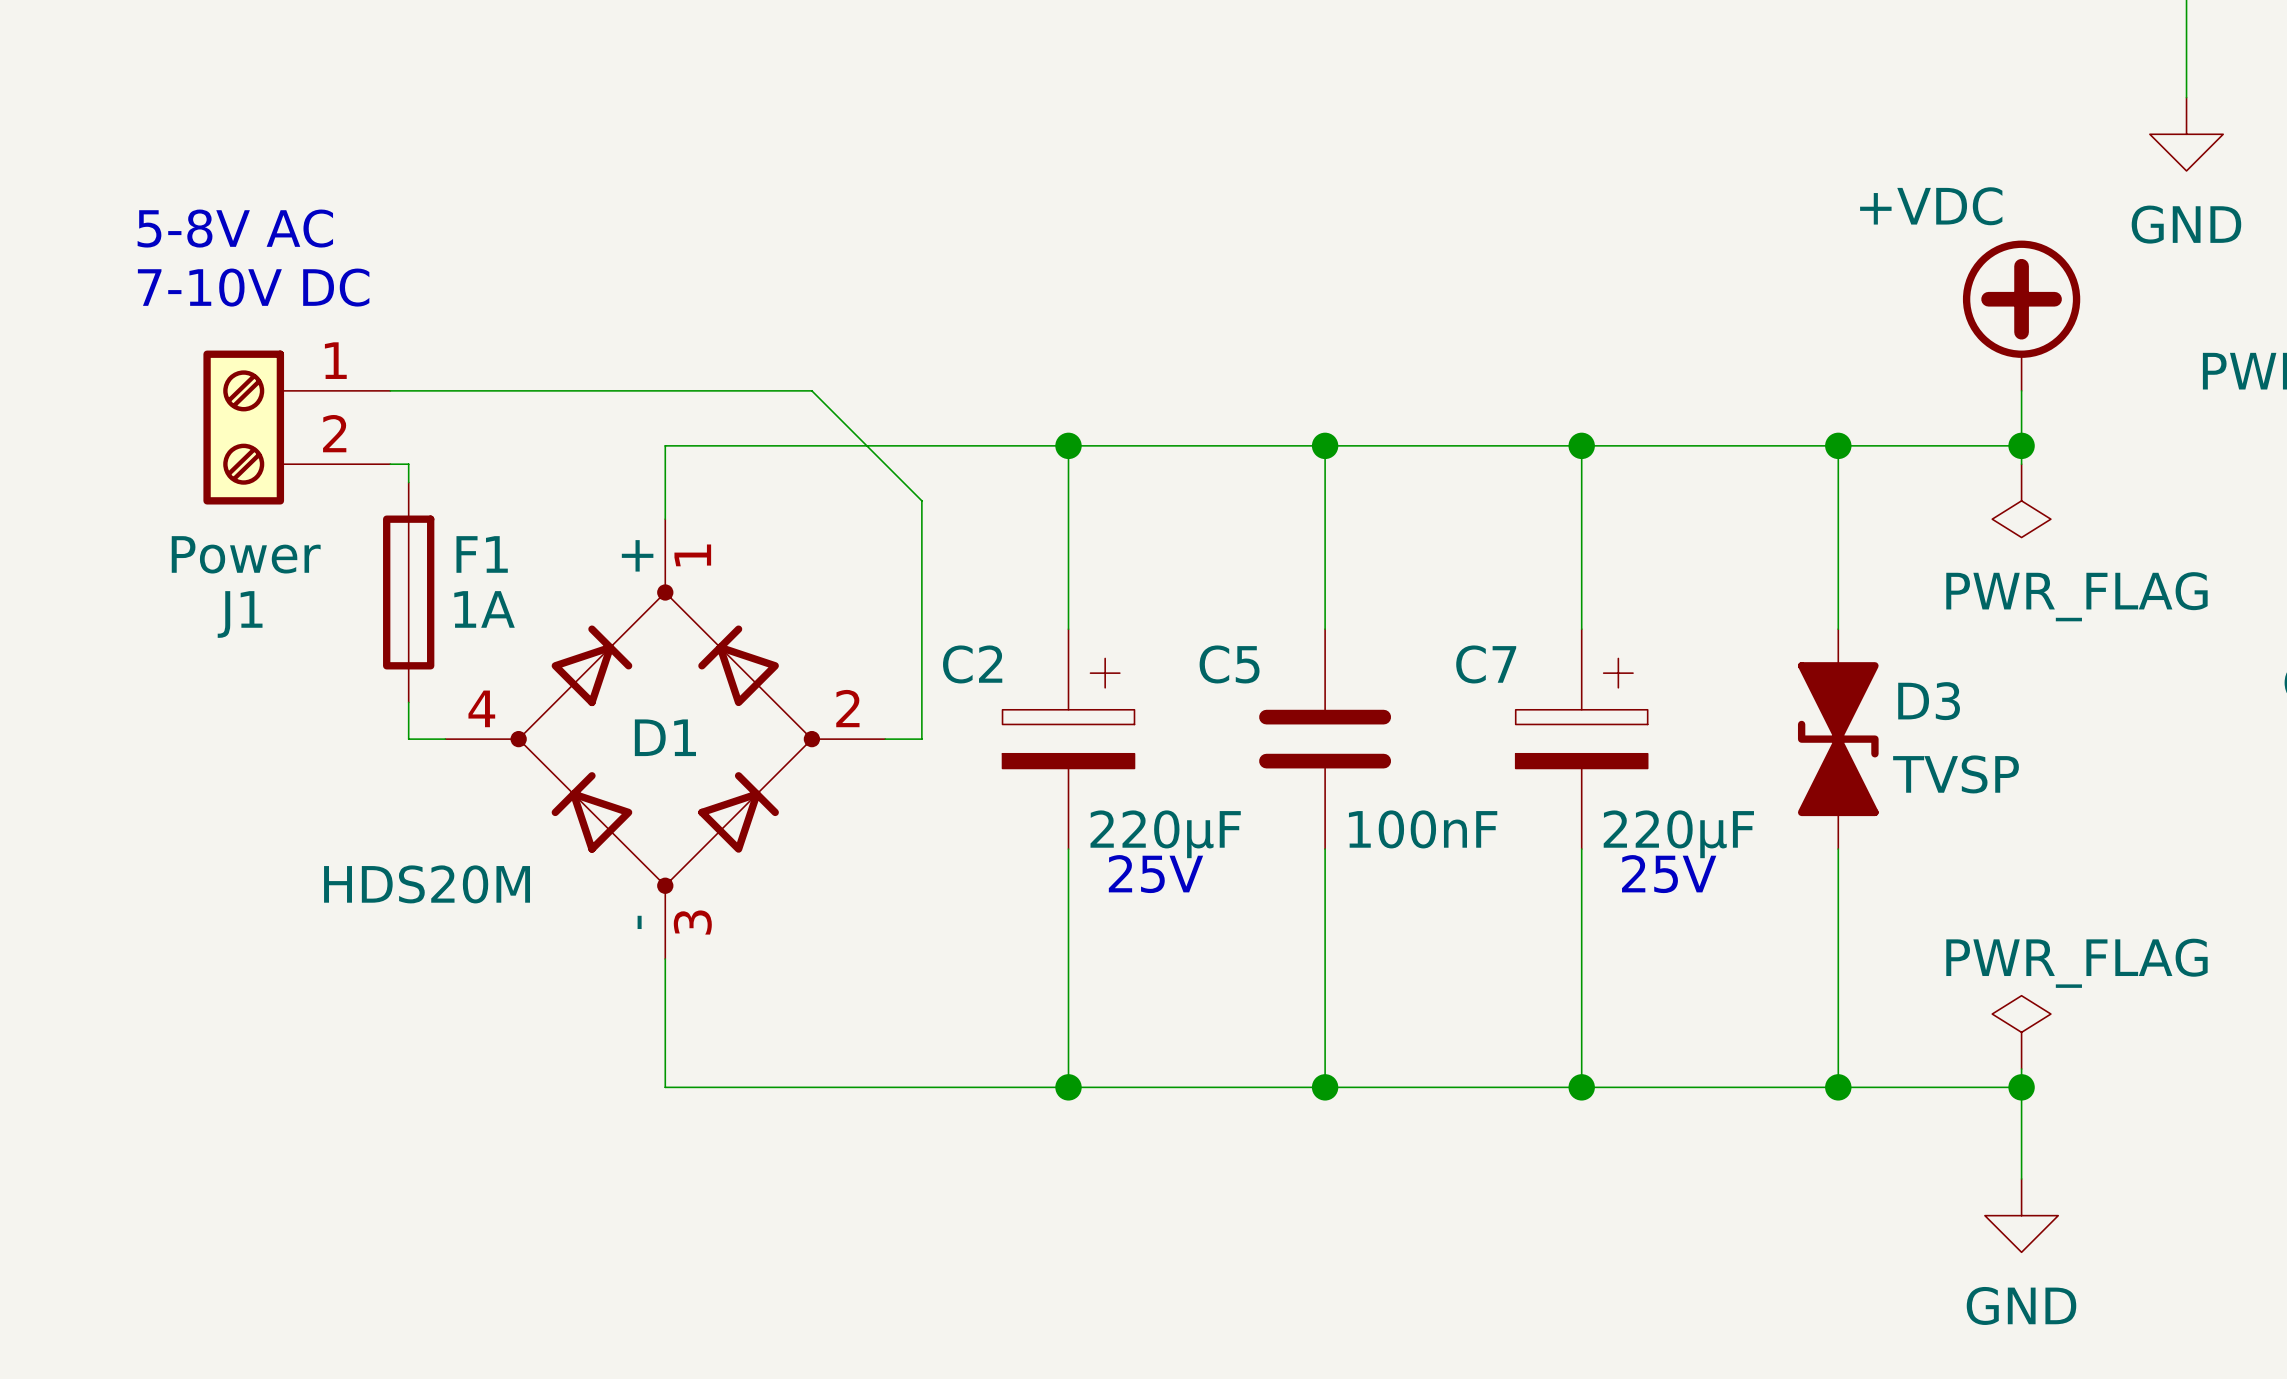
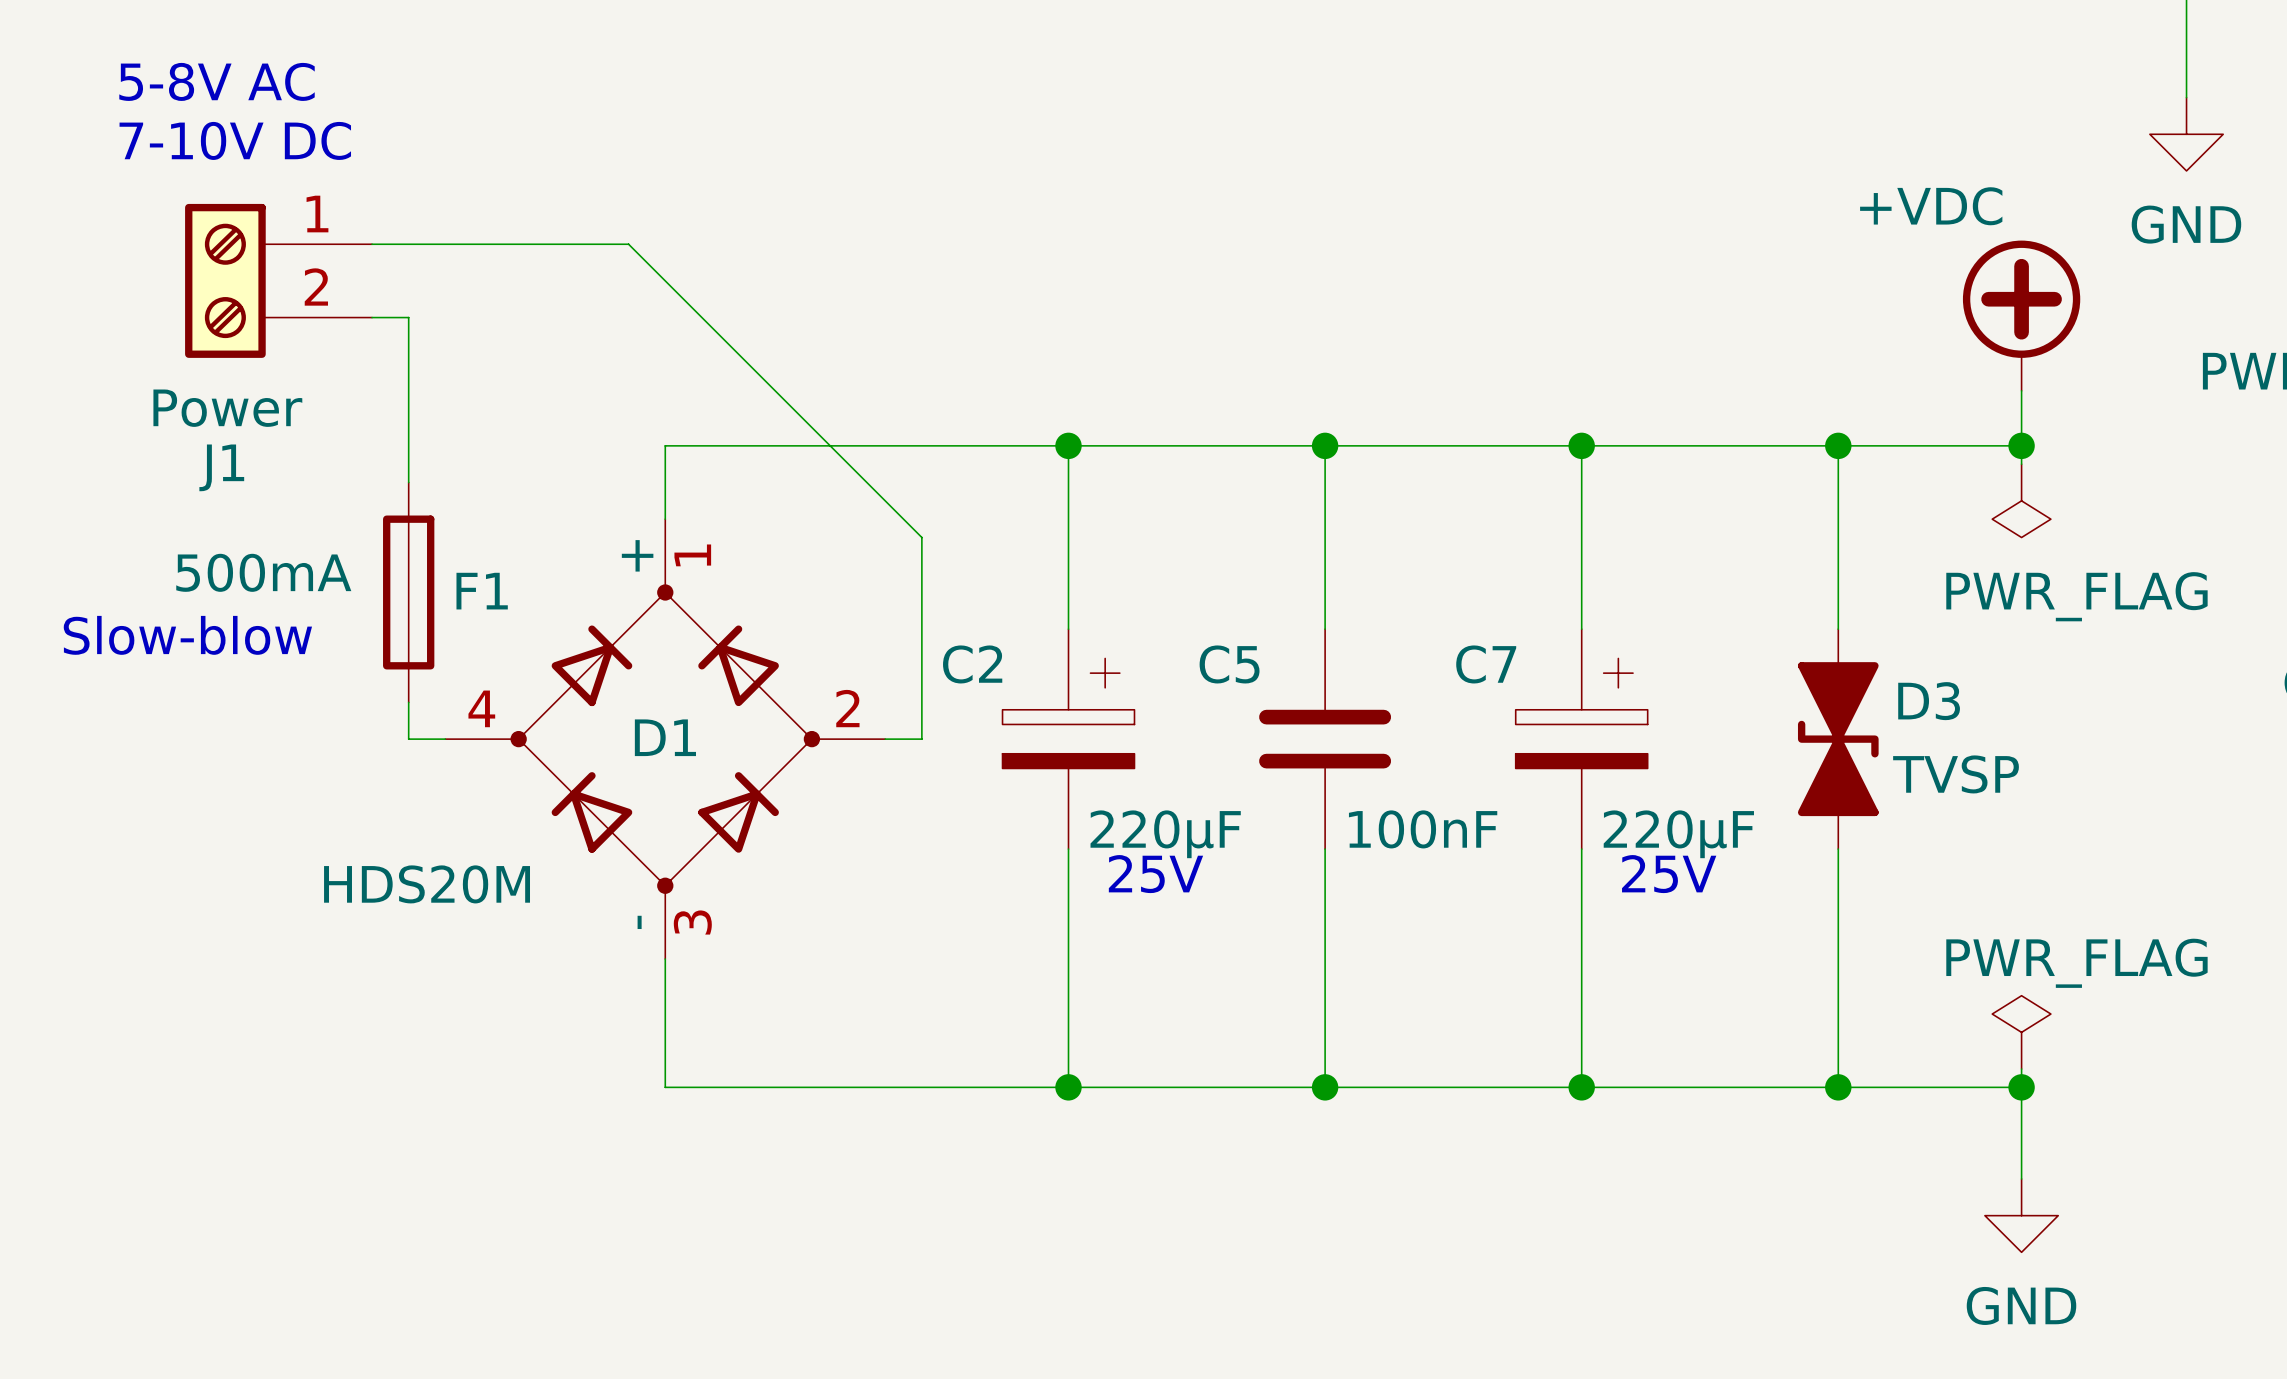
text position: 5-8V AC (235, 228) -> 5-8V AC (217, 81)
text position: 7-10V DC (253, 287) -> 7-10V DC (235, 140)
wire: (390, 390) (811, 390) (921, 500) (921, 537) -> (372, 244) (628, 244) (921, 537)
J1 position: (296, 427) -> (278, 280)
wire: (390, 464) (408, 464) -> (372, 317) (408, 317) (408, 464)
F1 name position: F1 (482, 554) -> F1 (482, 591)
F1 value: 1A (484, 609) -> 500mA (263, 572)
text: none -> Slow-blow (187, 635)

